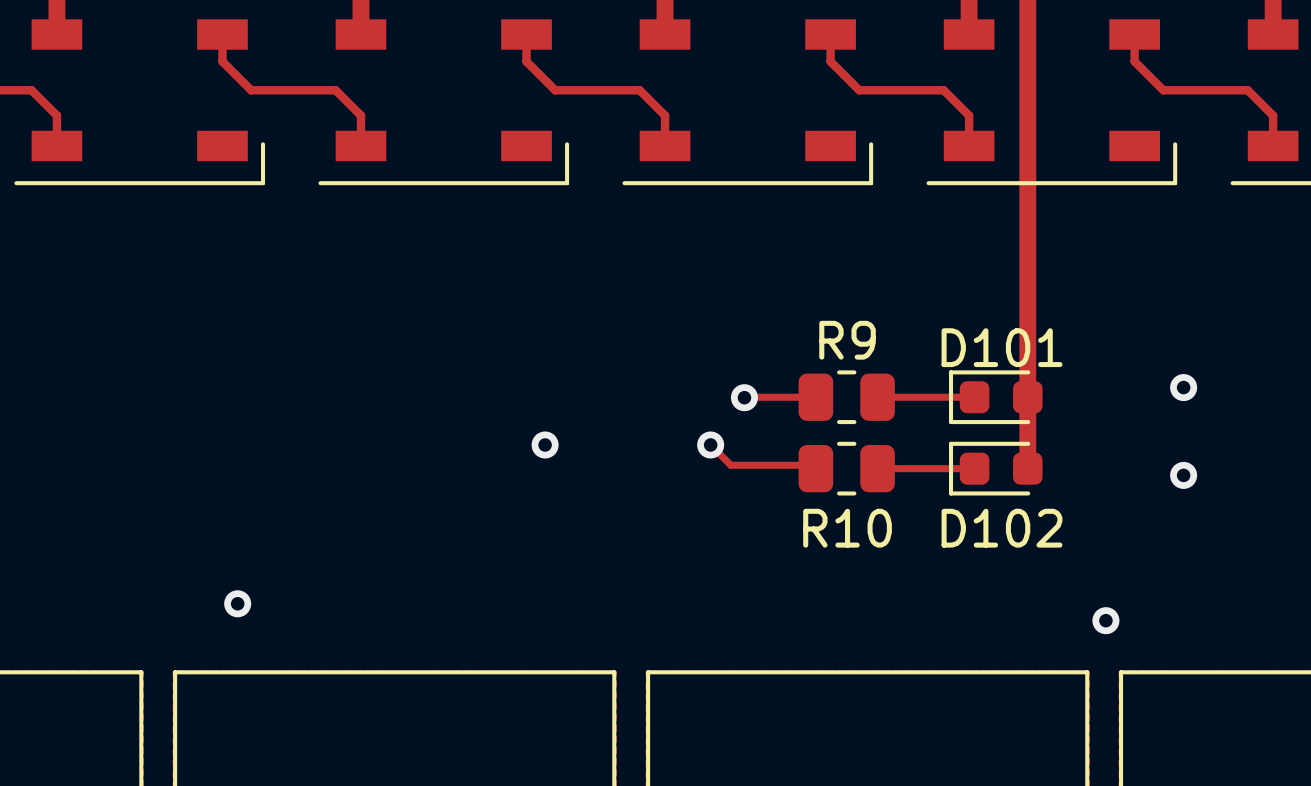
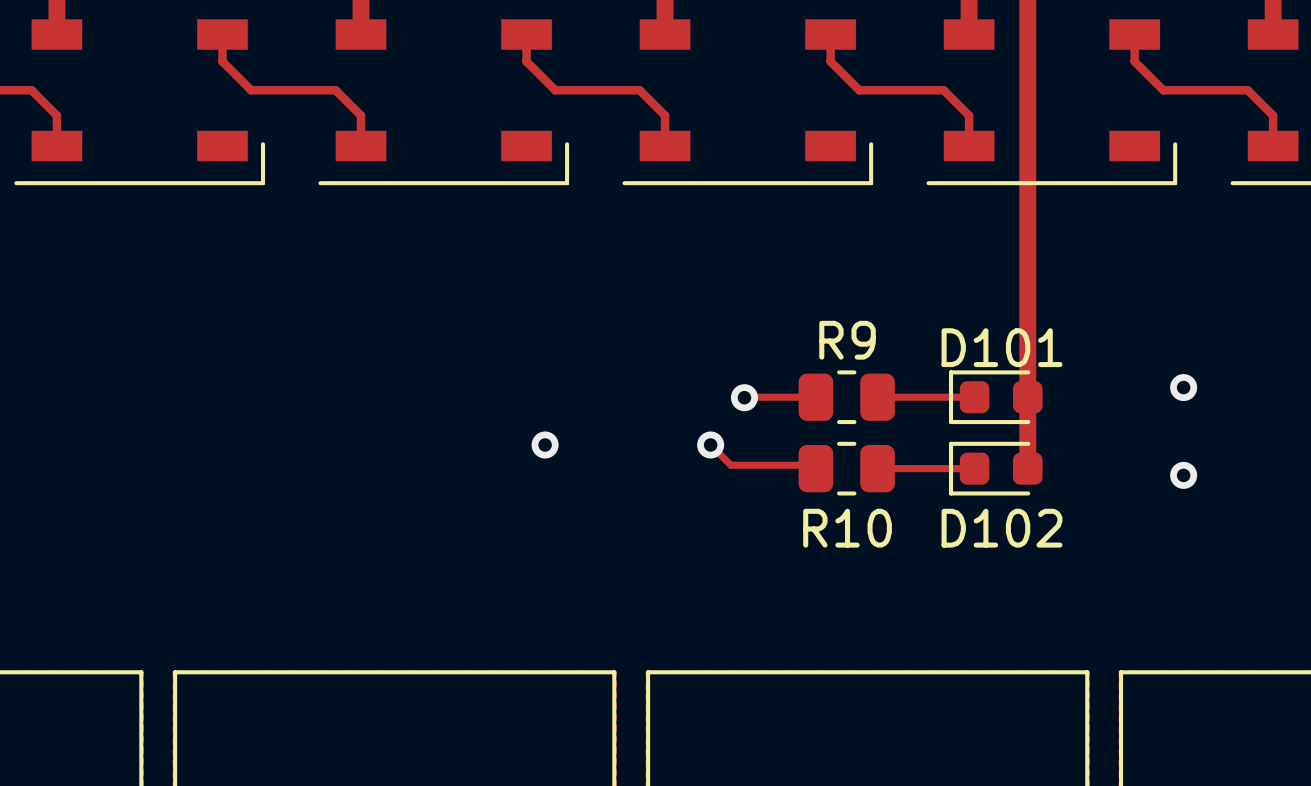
via: (237, 603) -> none
via: (1105, 620) -> none

